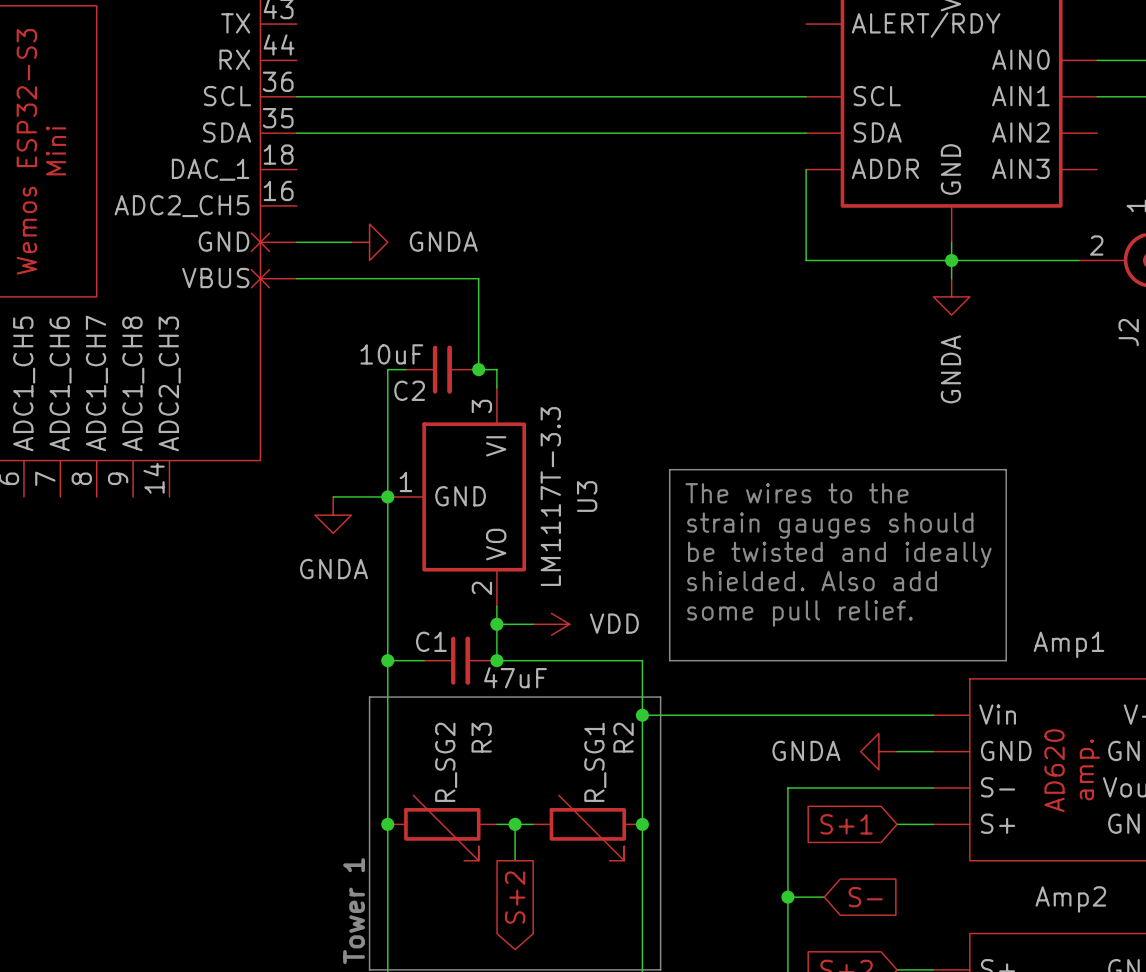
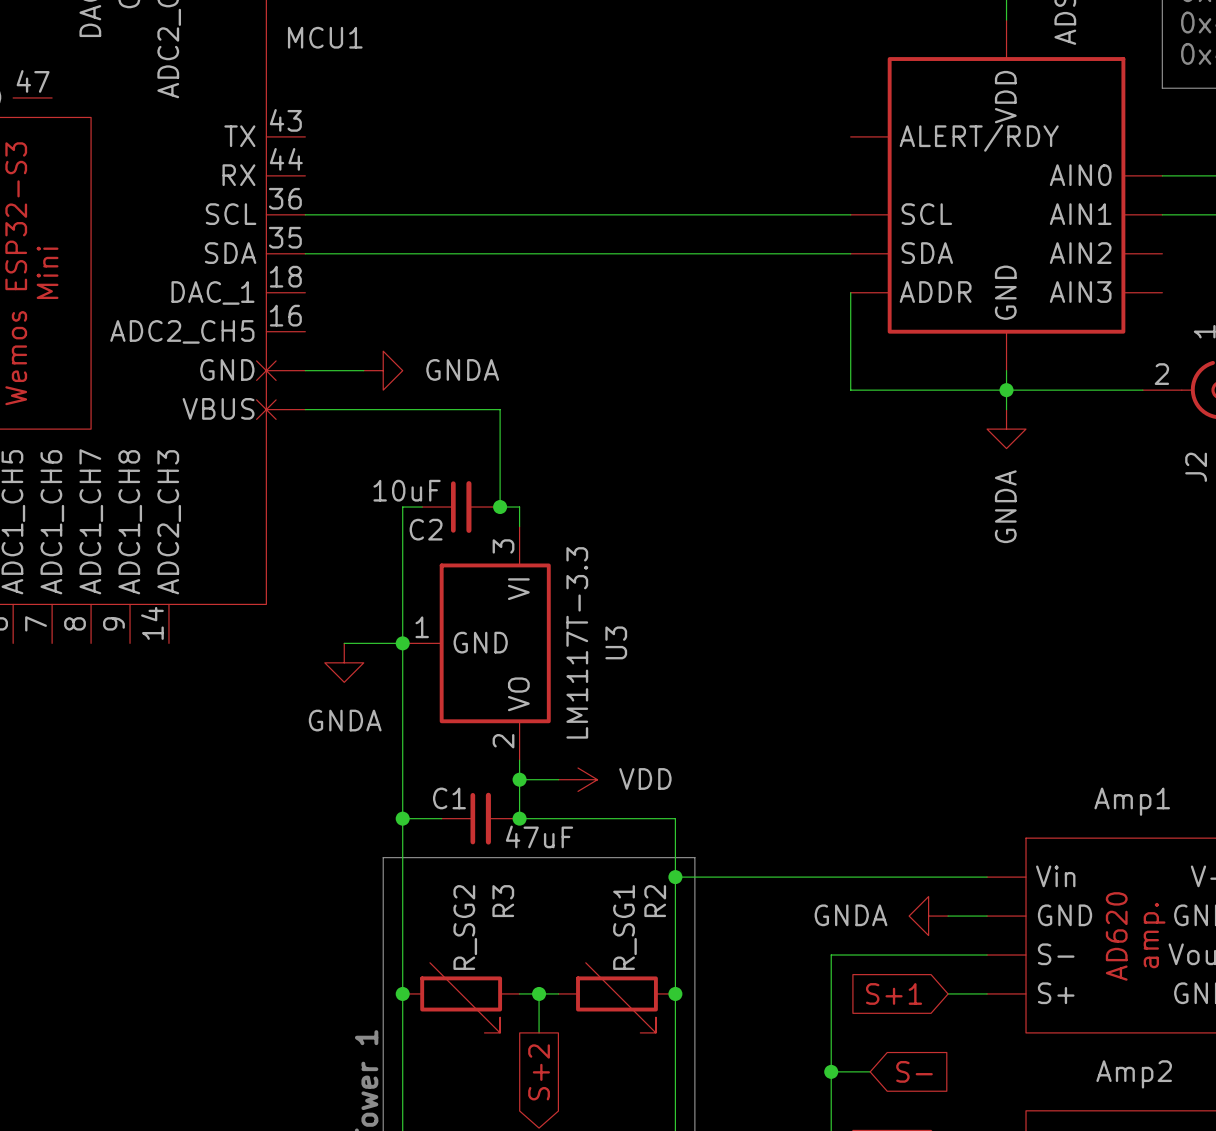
line: (669, 469) (1006, 469) (1006, 660) (669, 660) (669, 469) -> none
text: The wires to the (796, 493) -> none
text: strain gauges should (830, 525) -> none
text: be twisted and ideally (839, 554) -> none
text: shielded. Also add (812, 581) -> none
text: some pull relief. (799, 613) -> none

